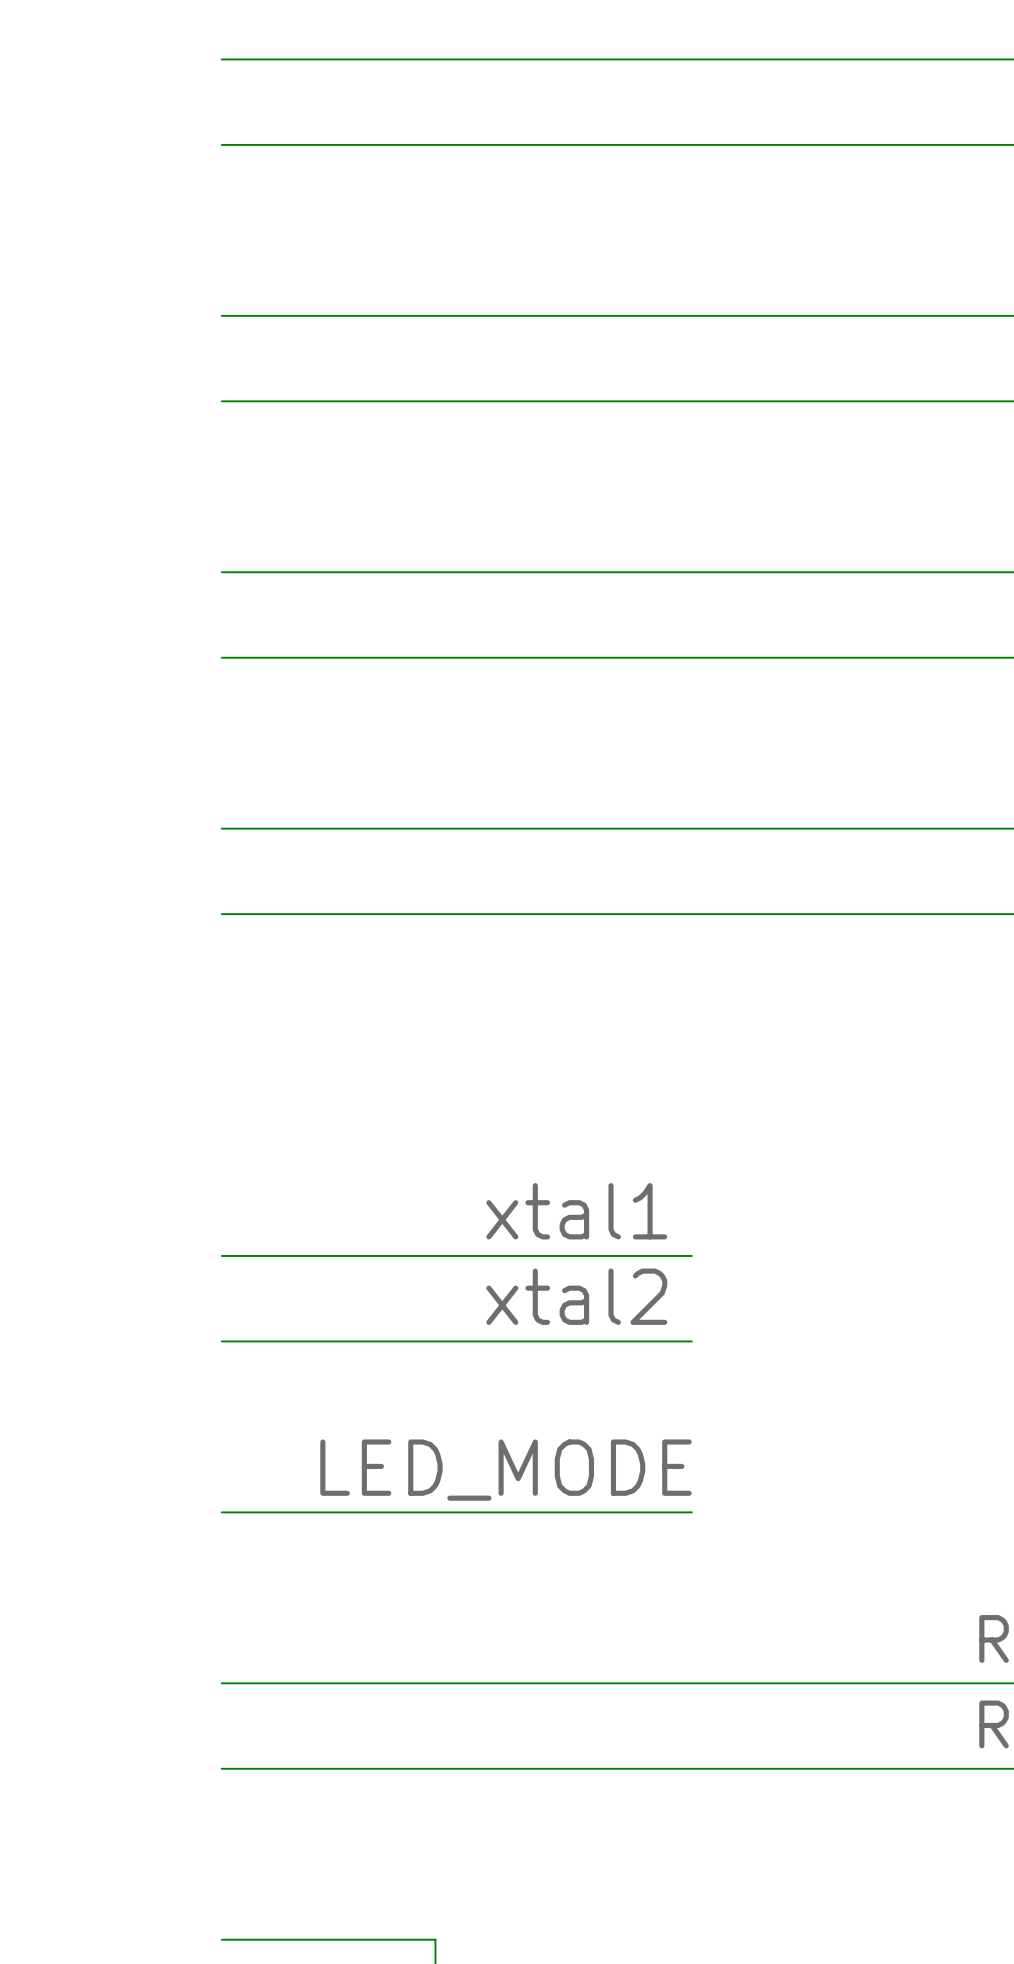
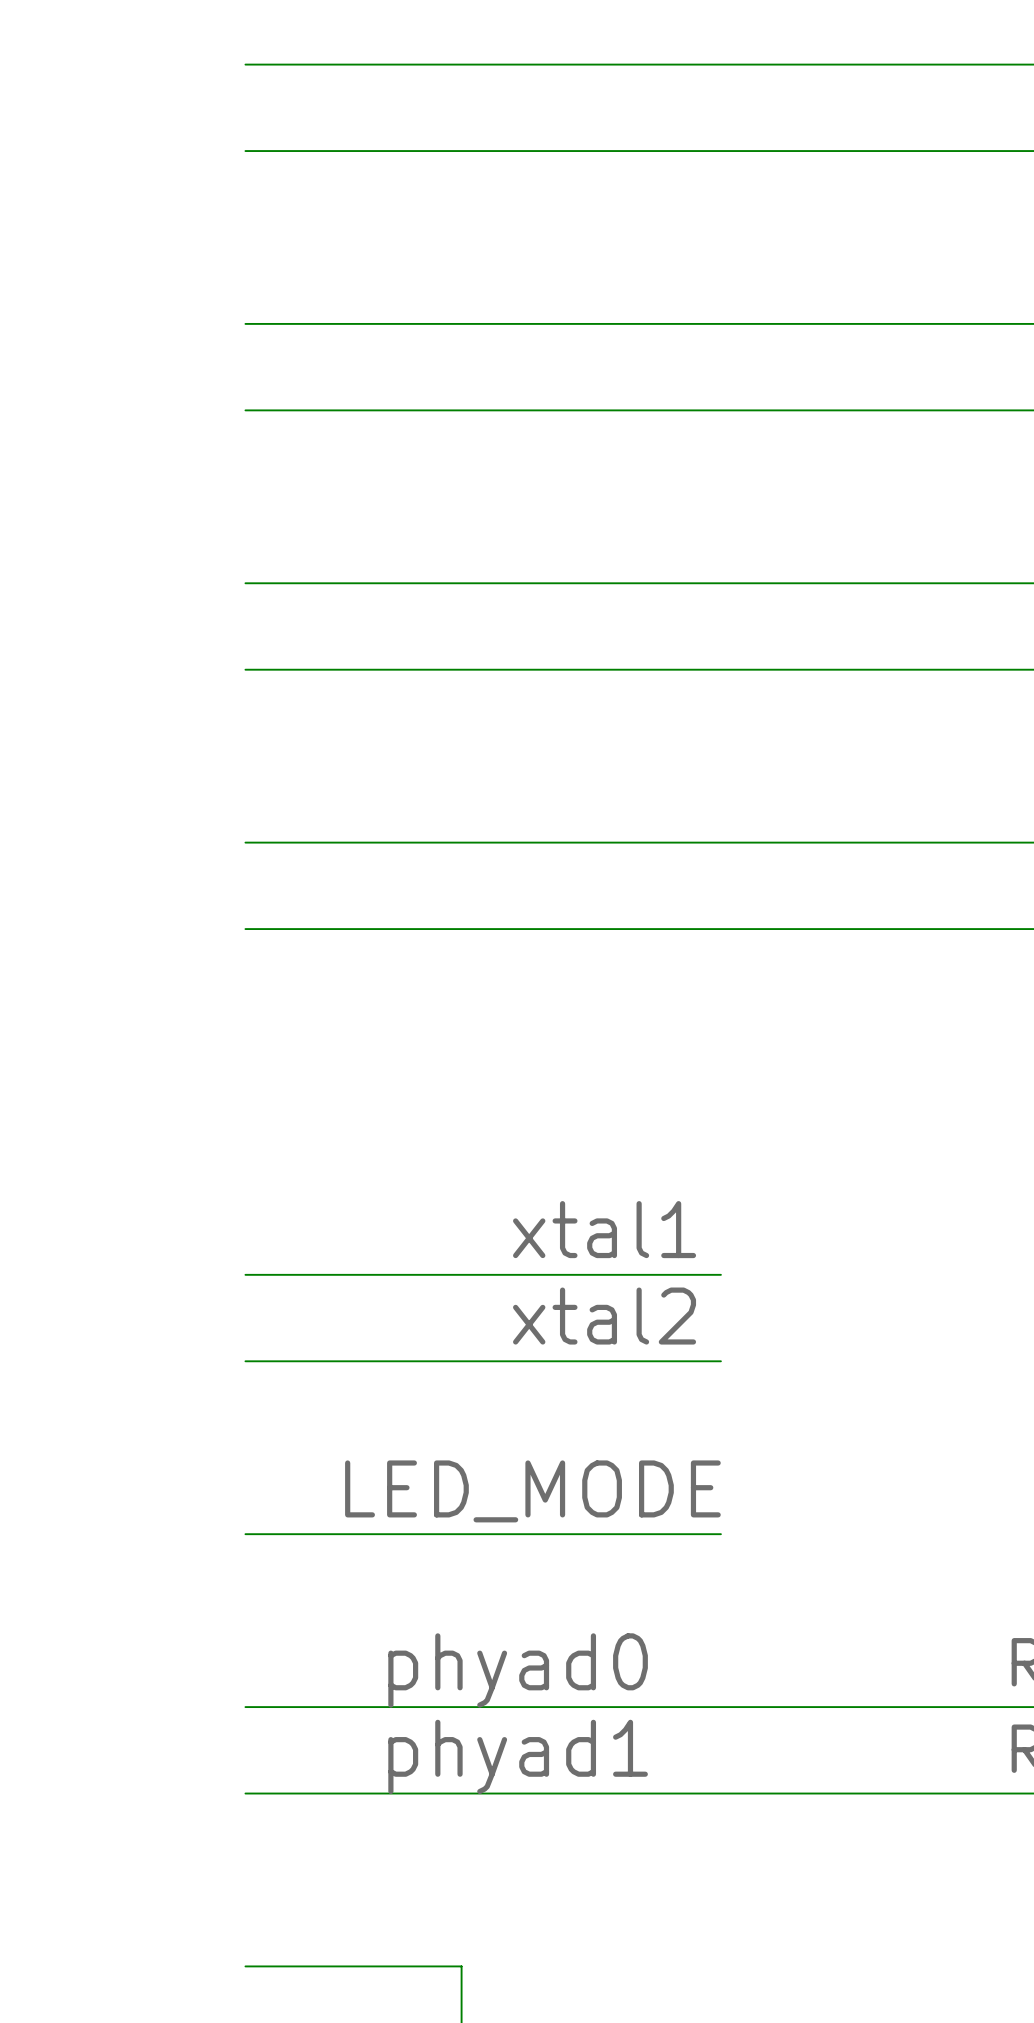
label: none -> phyad0 (518, 1670)
label: none -> phyad1 (518, 1756)

